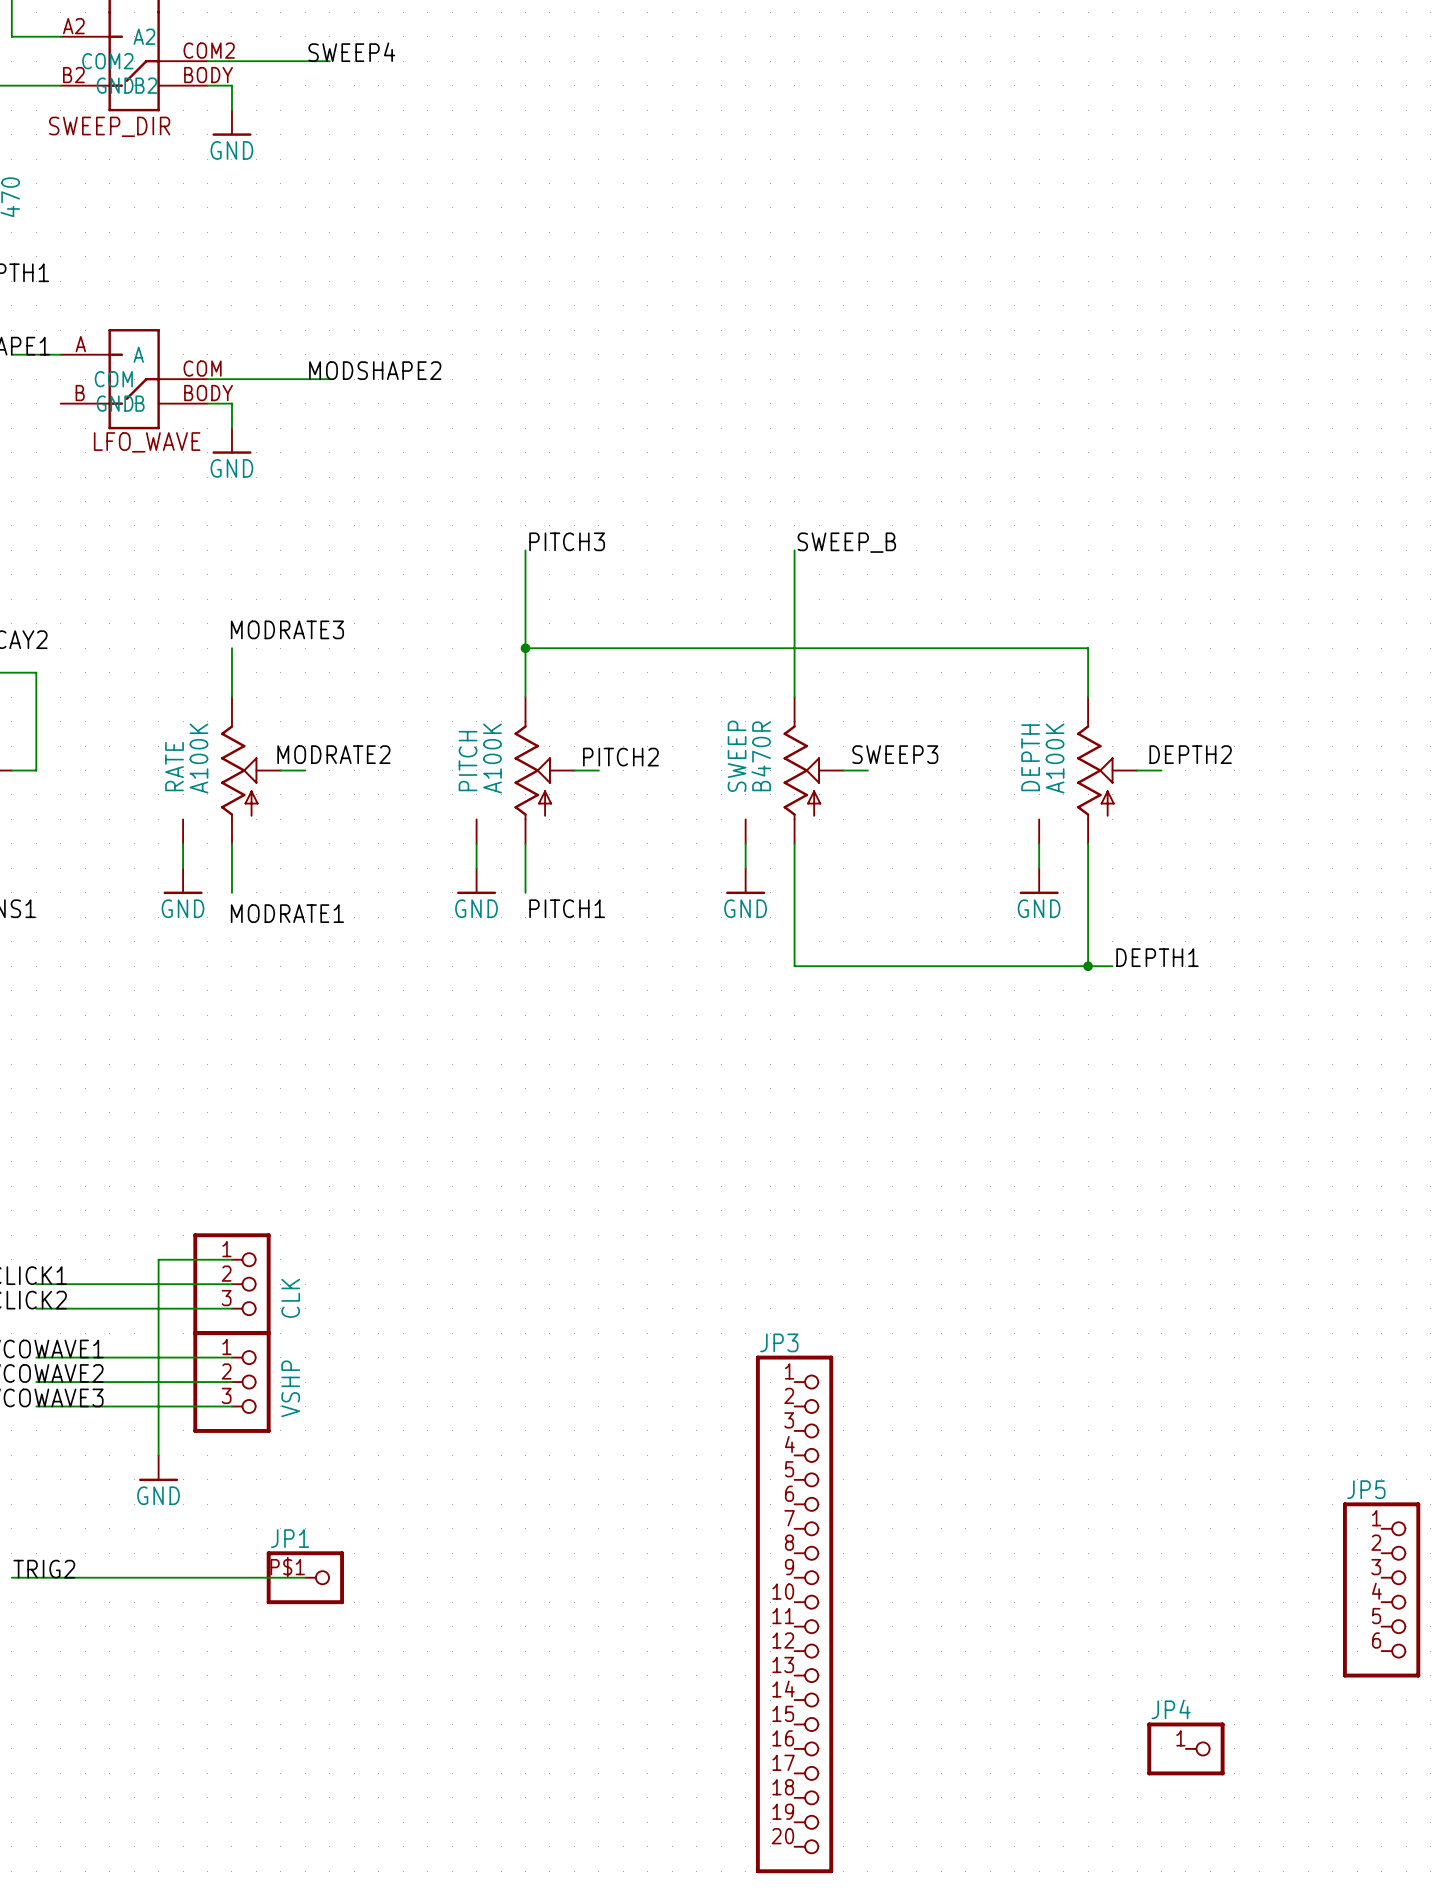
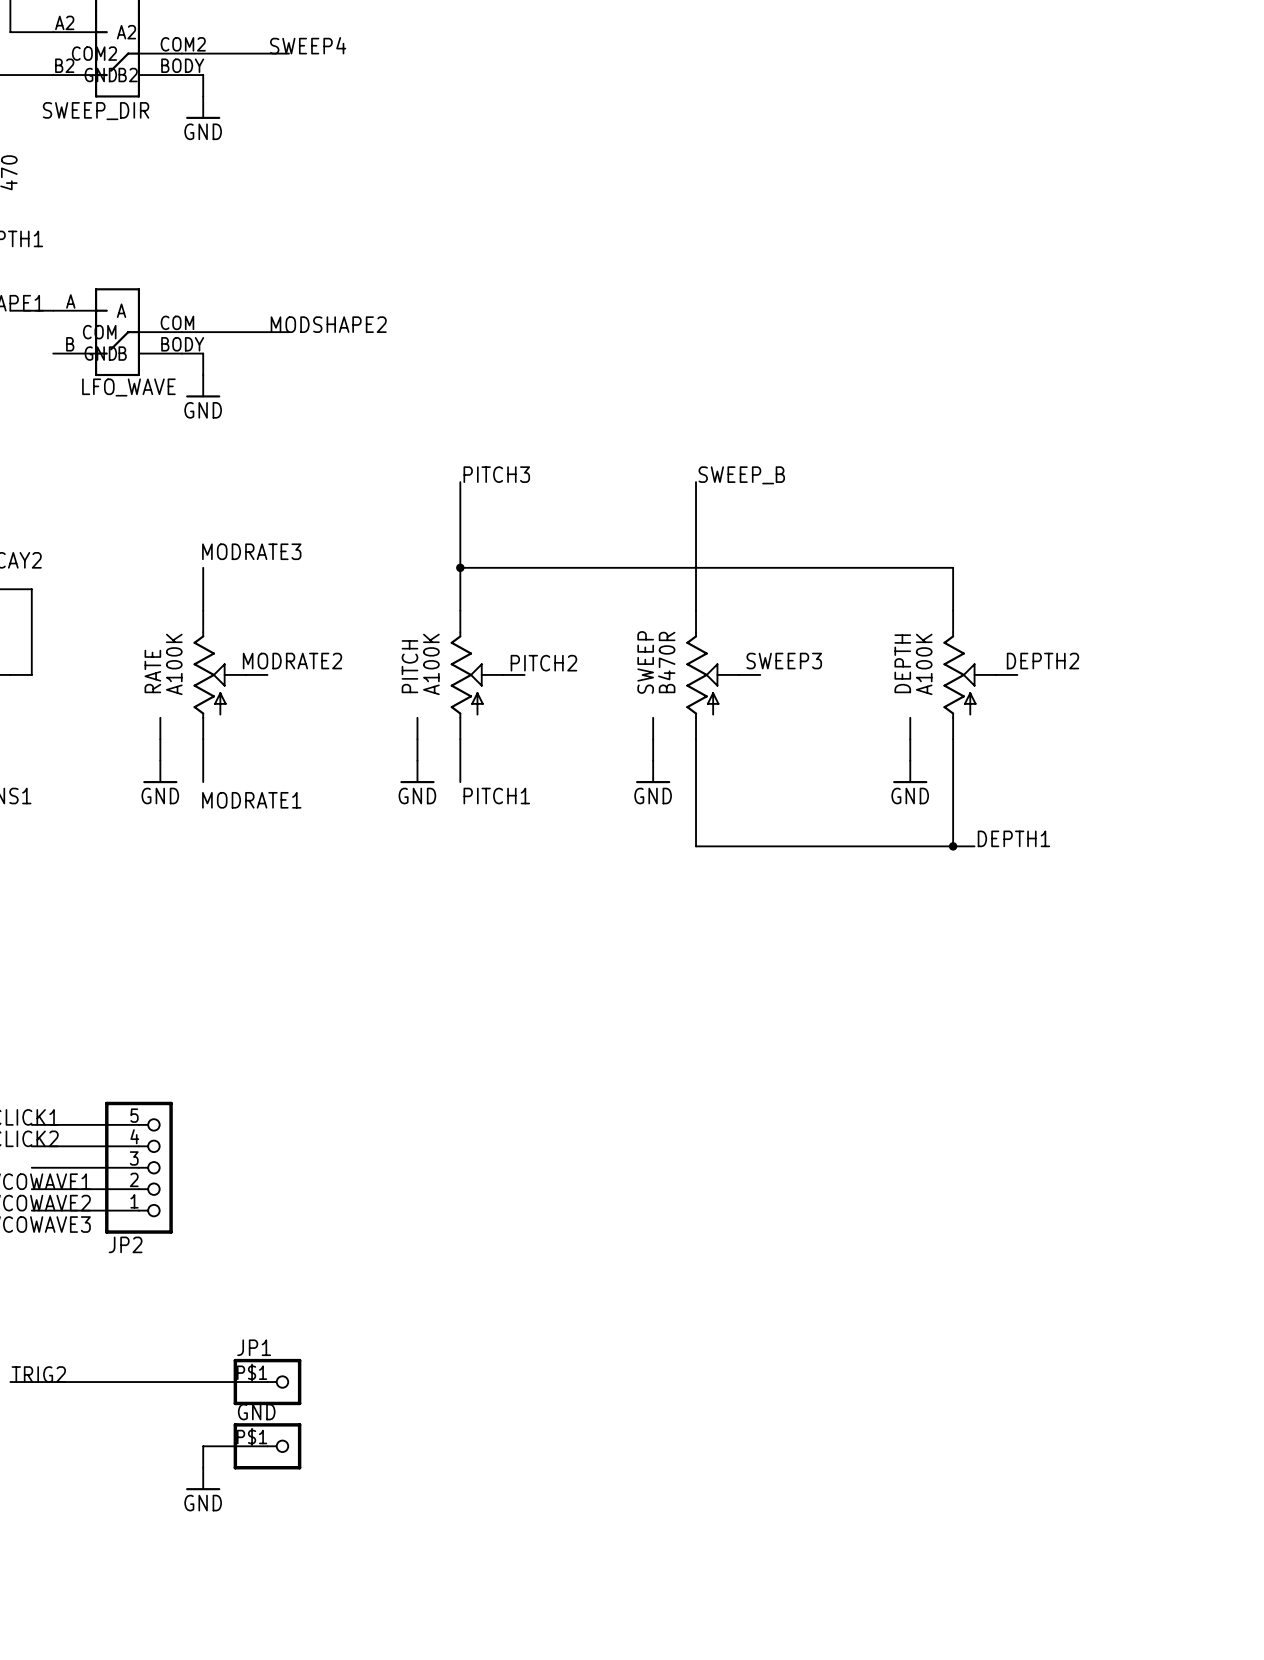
wire: (231, 1259) (158, 1259) (158, 1455) -> none
wire: (158, 1284) (231, 1284) -> none
CLK: (231, 1284) -> none
wire: (158, 1308) (231, 1308) -> none
wire: none -> (31, 1167) (138, 1167)
JP2: none -> (138, 1167)
wire: (158, 1357) (231, 1357) -> none
wire: (158, 1382) (231, 1382) -> none
VSHP: (231, 1382) -> none
wire: (36, 1406) (231, 1406) -> none
power symbol position: GND (158, 1468) -> GND (203, 1478)
JP5: (1381, 1589) -> none
JP3: (794, 1614) -> none
wire: none -> (267, 1446) (203, 1446) (203, 1467)
GND: none -> (267, 1446)
JP4: (1185, 1748) -> none

